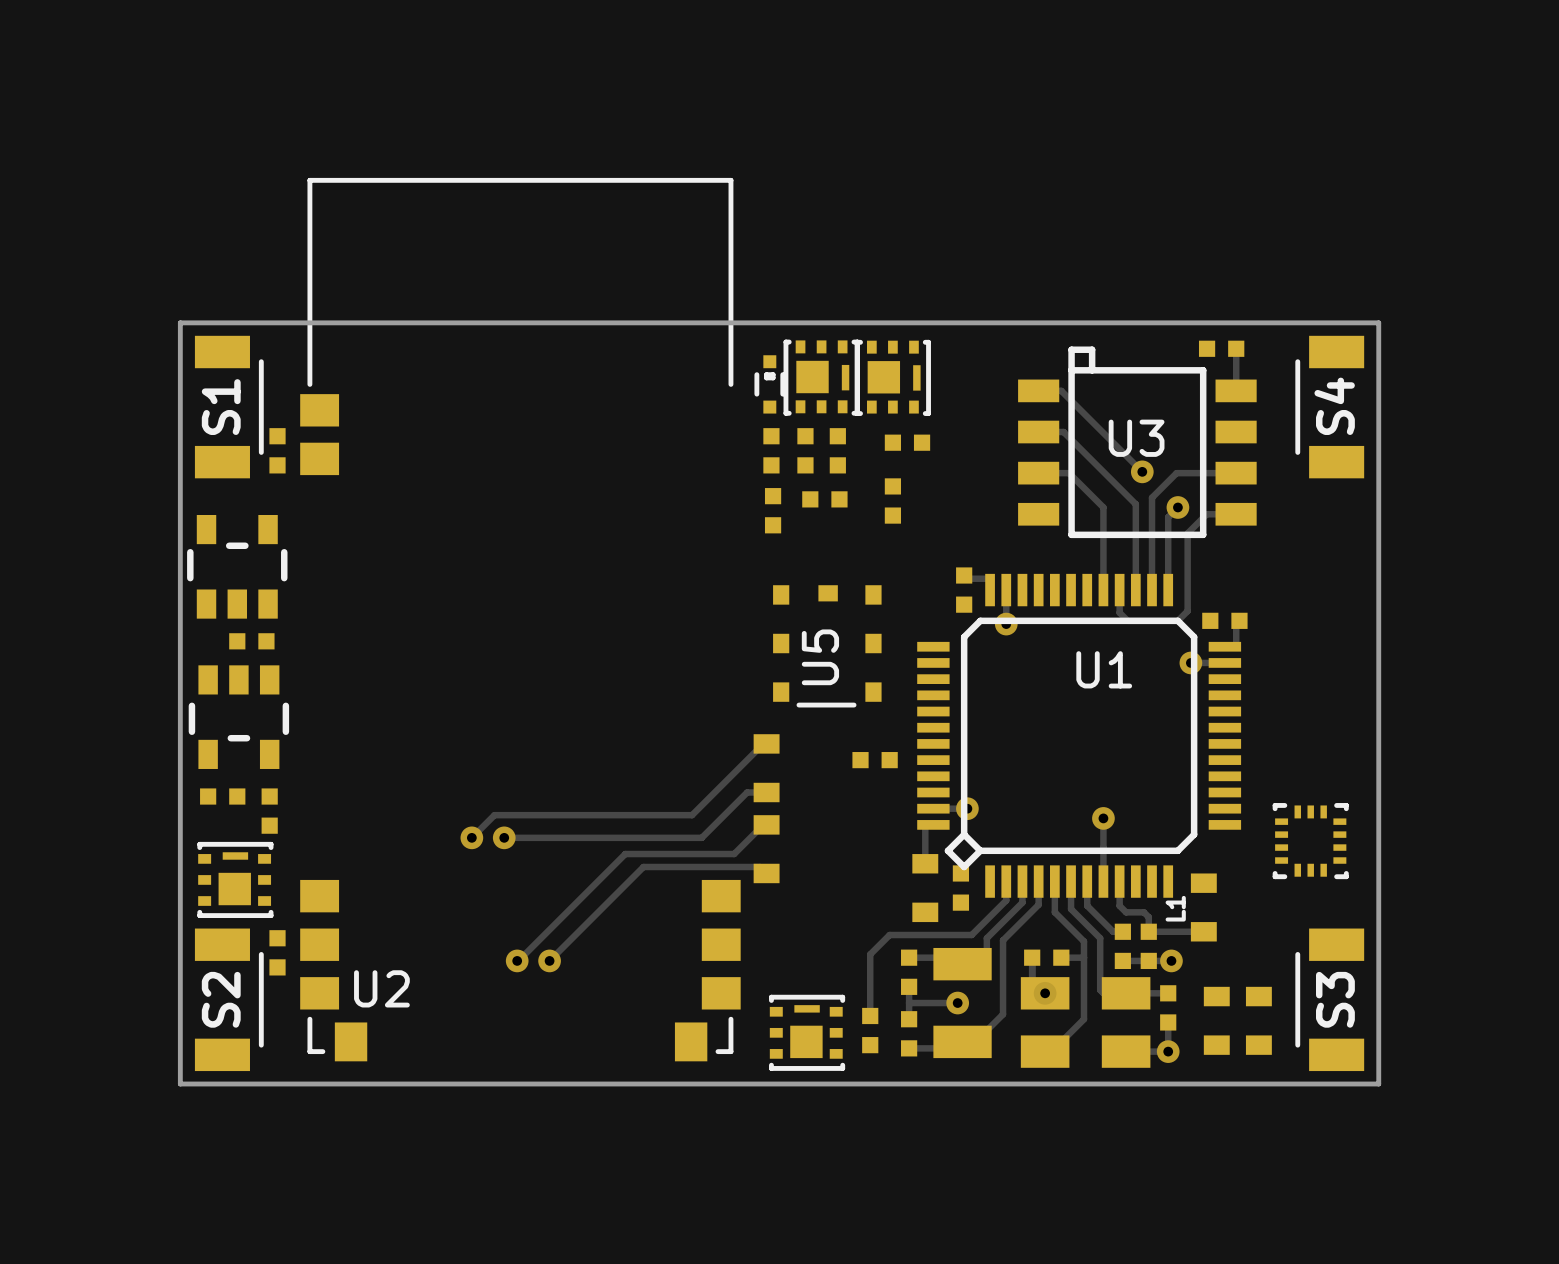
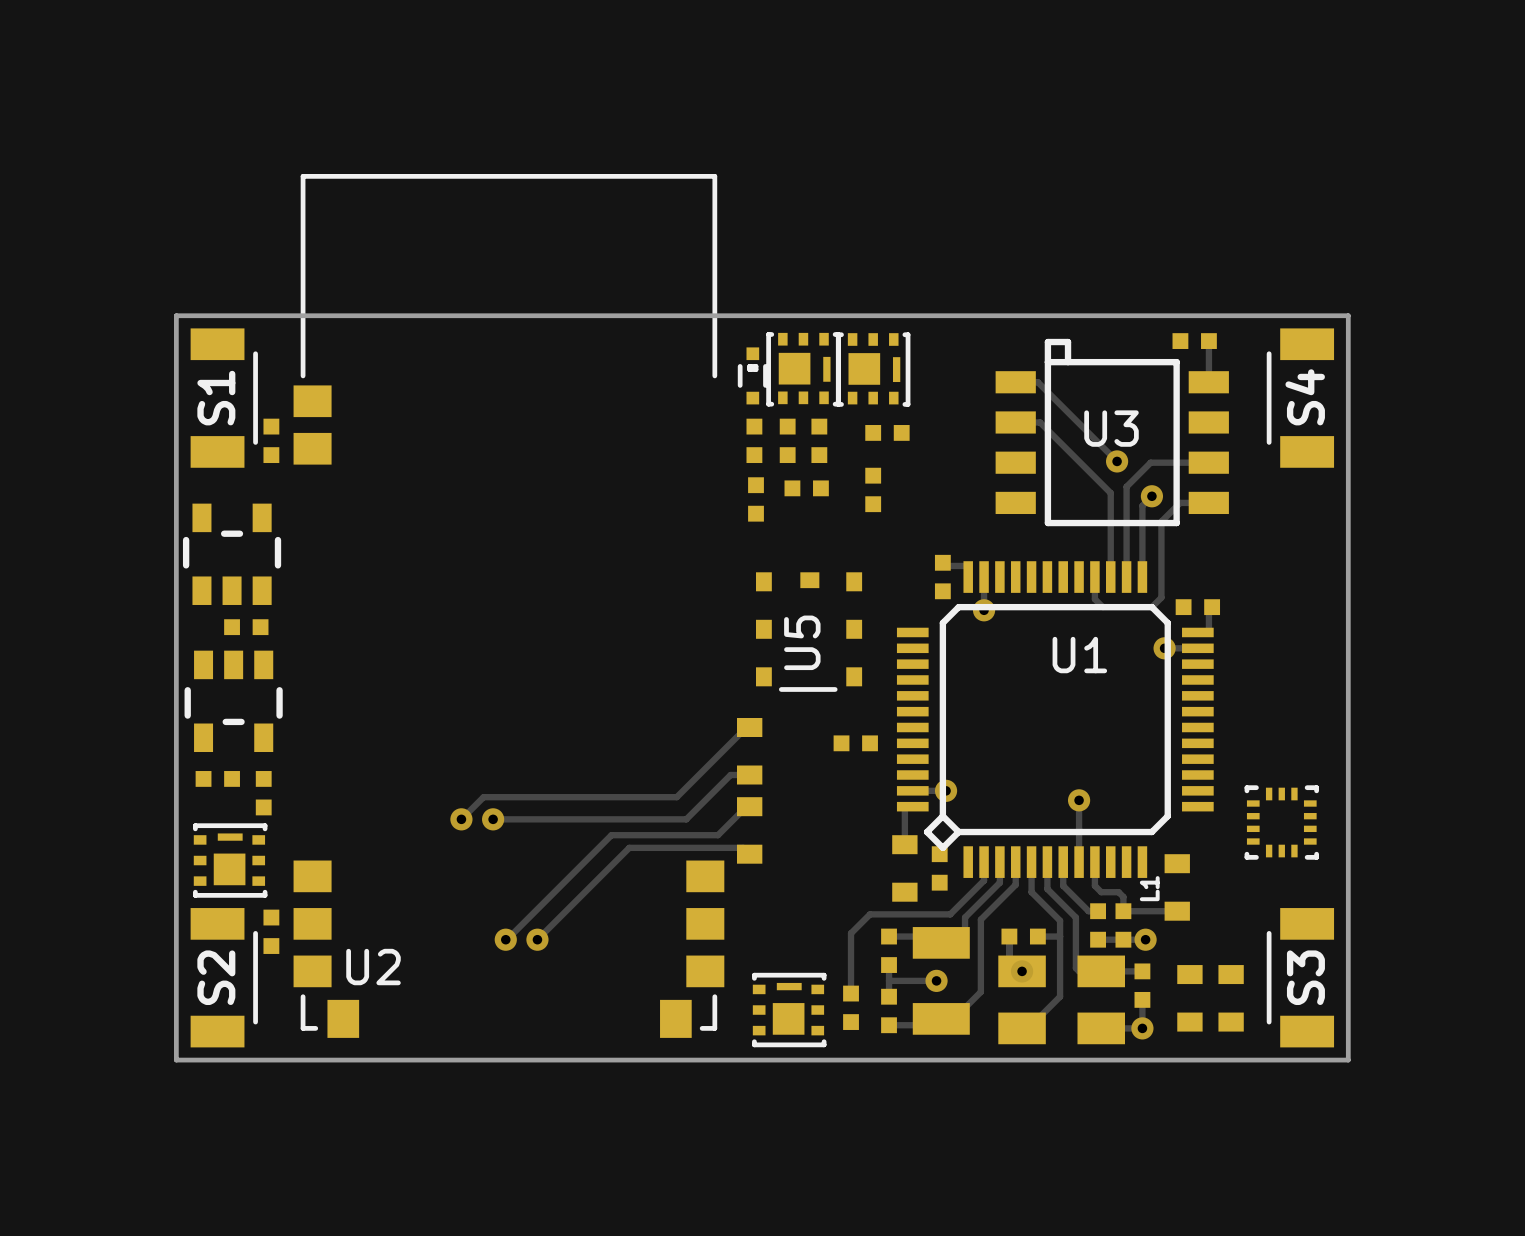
track: (1038, 473) (1069, 473) (1103, 507) (1103, 590) -> none

